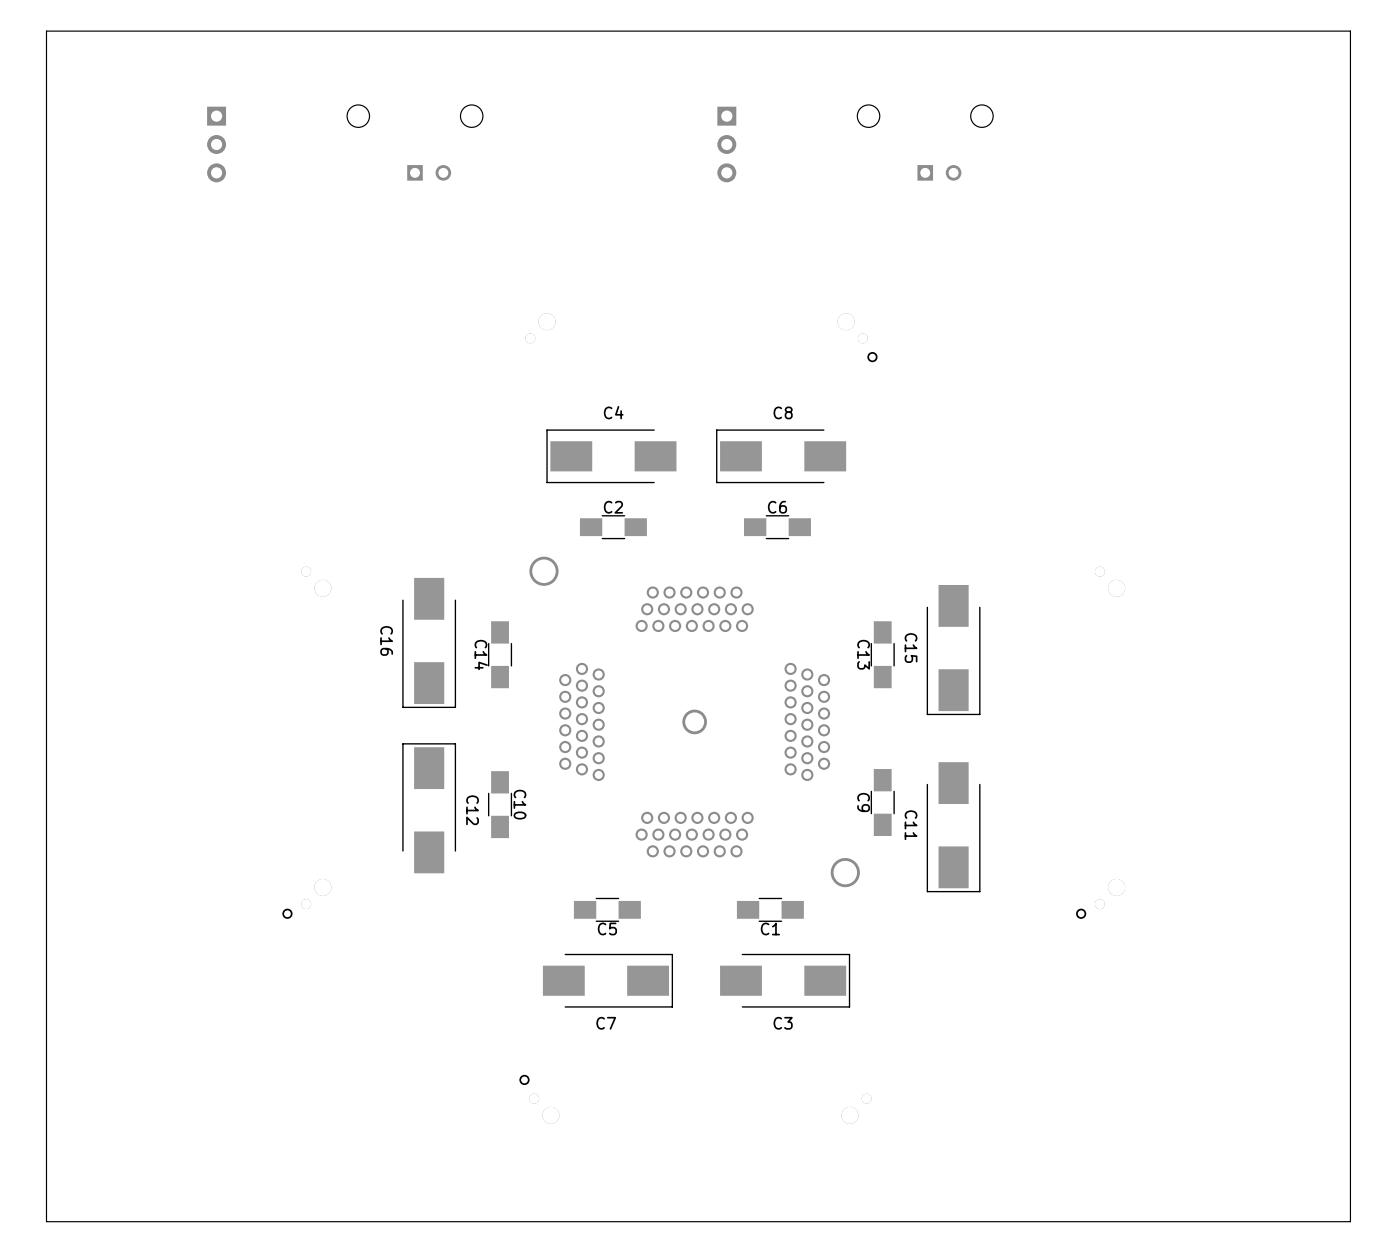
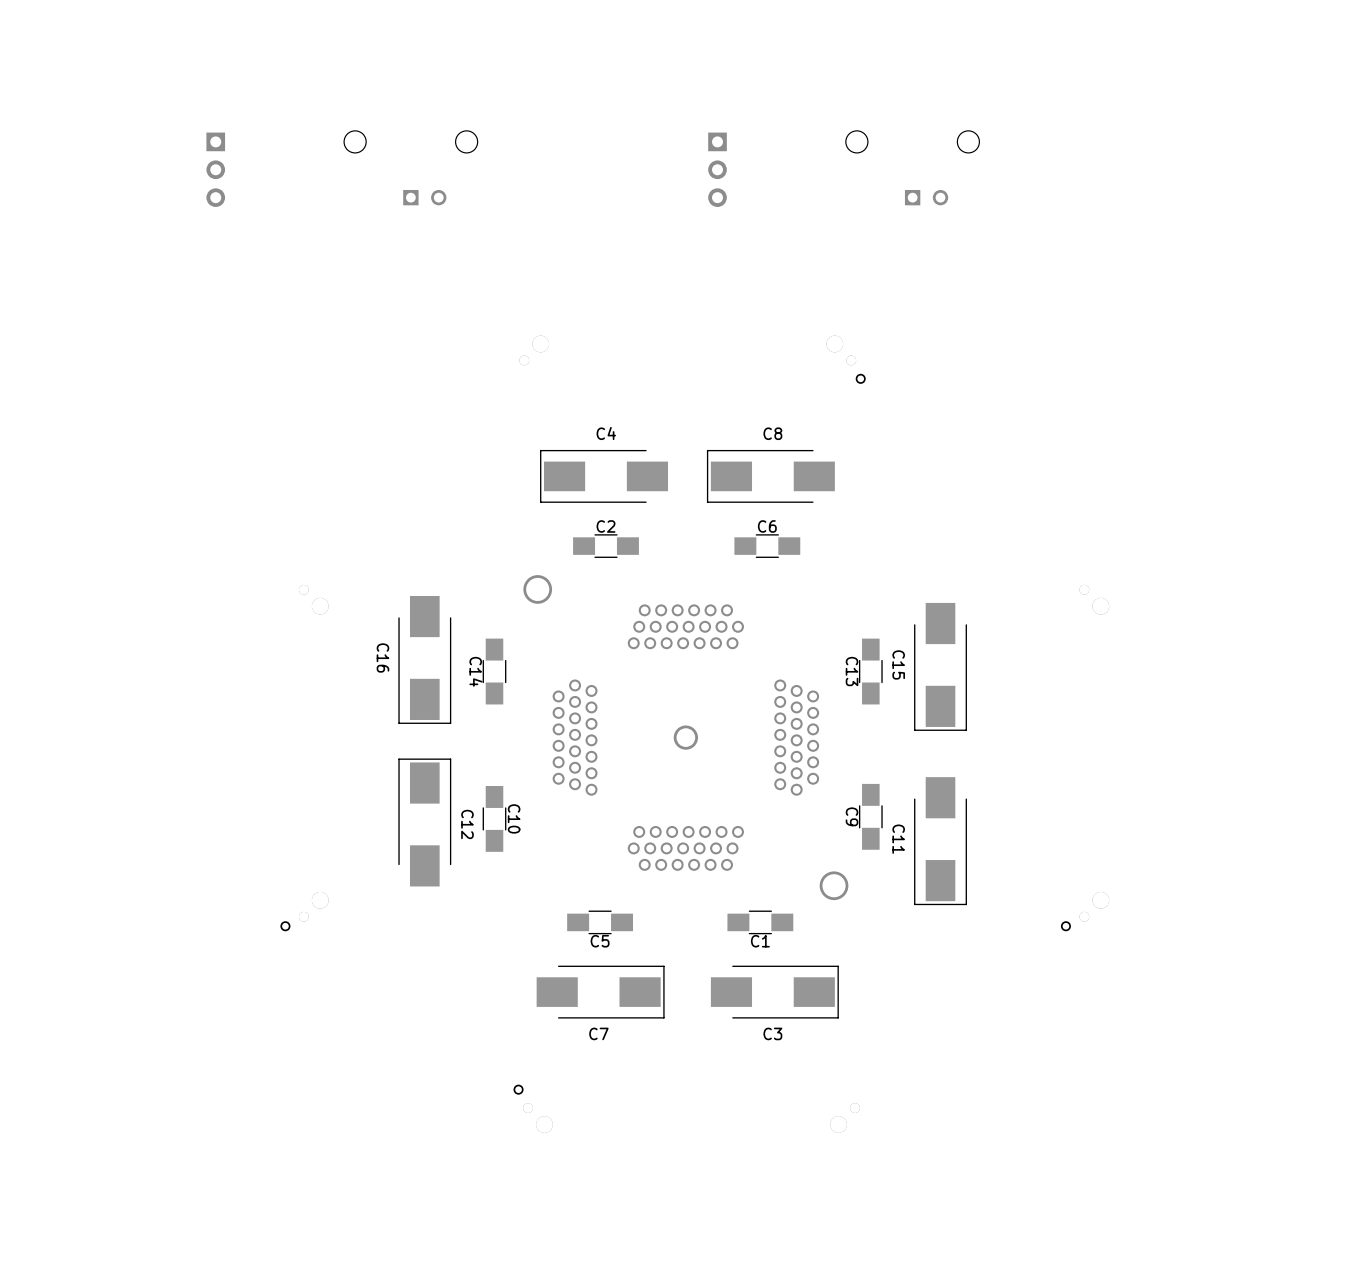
board edge: (1350, 31) (46, 31) (46, 1221) (1350, 1221) (1350, 31) -> none

